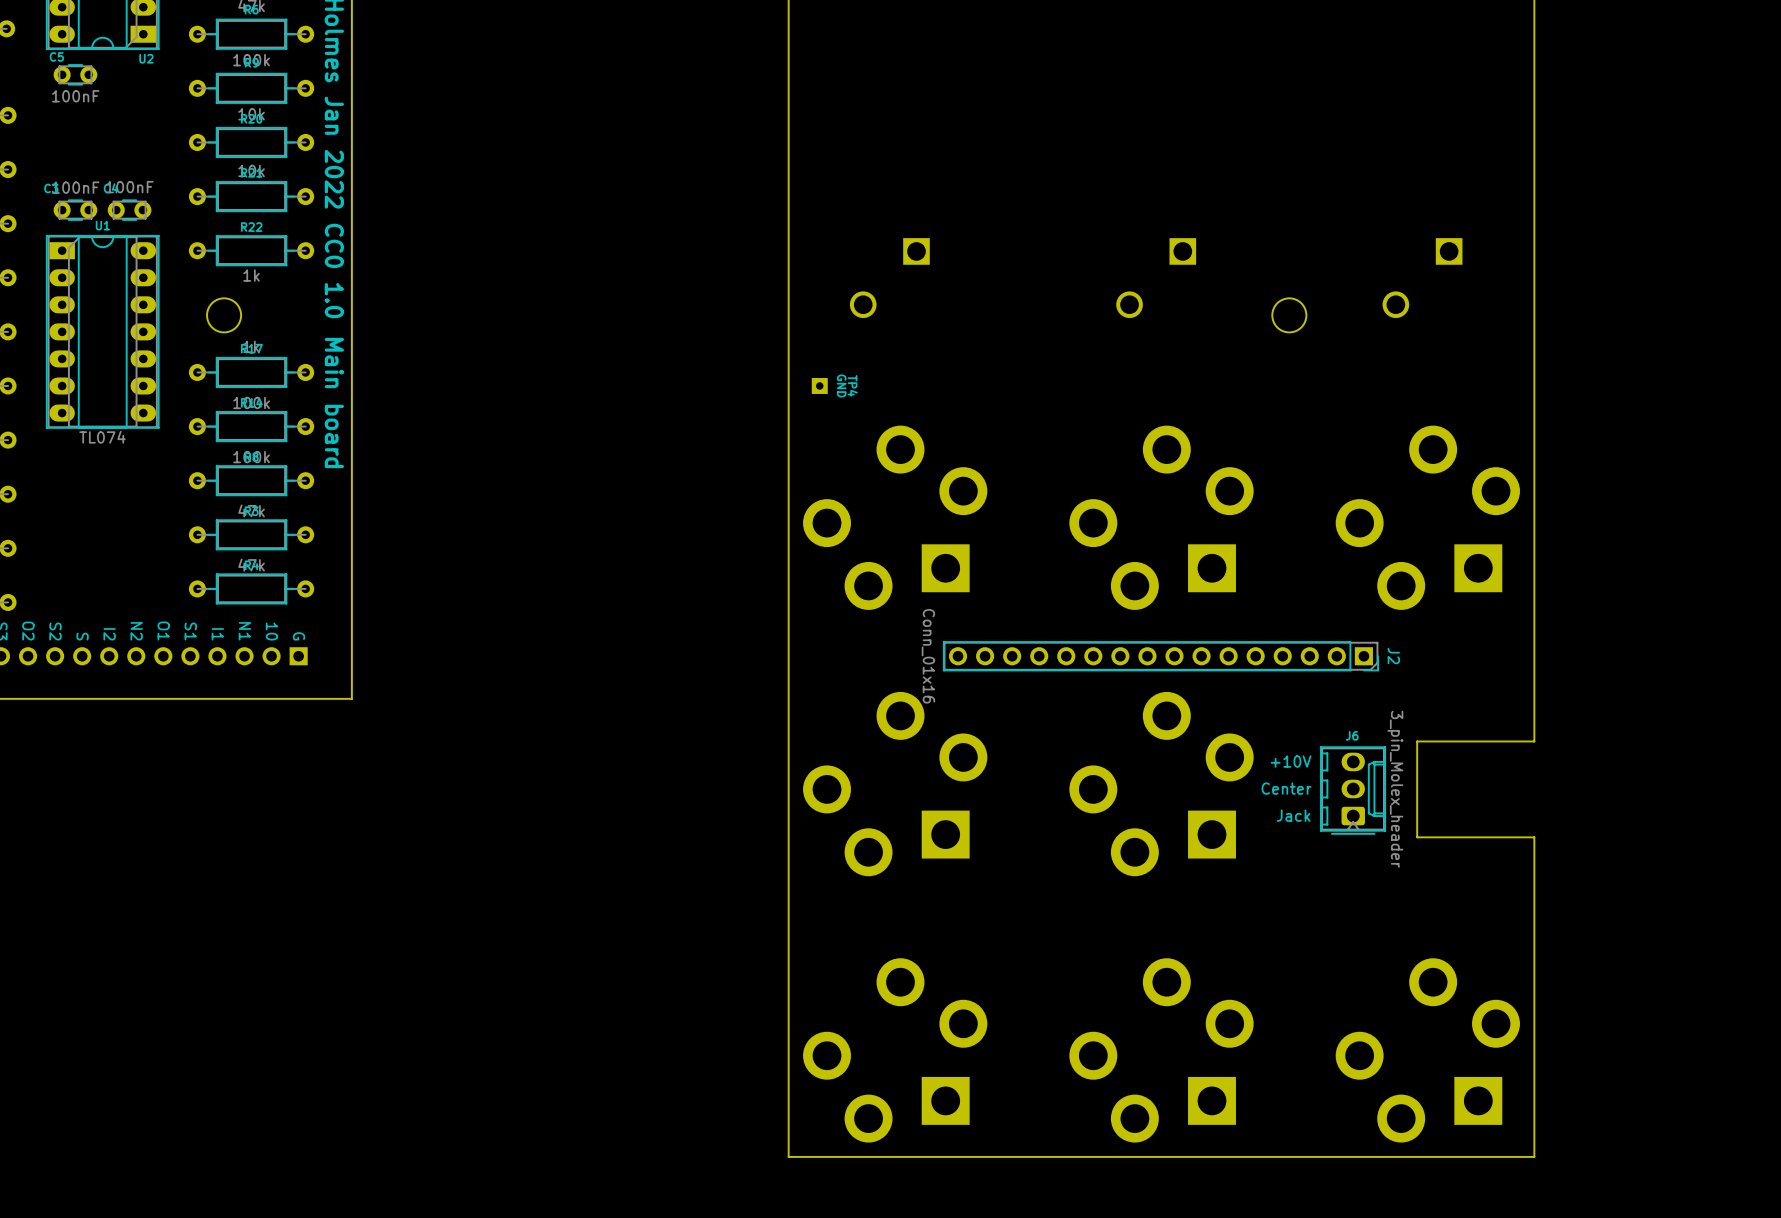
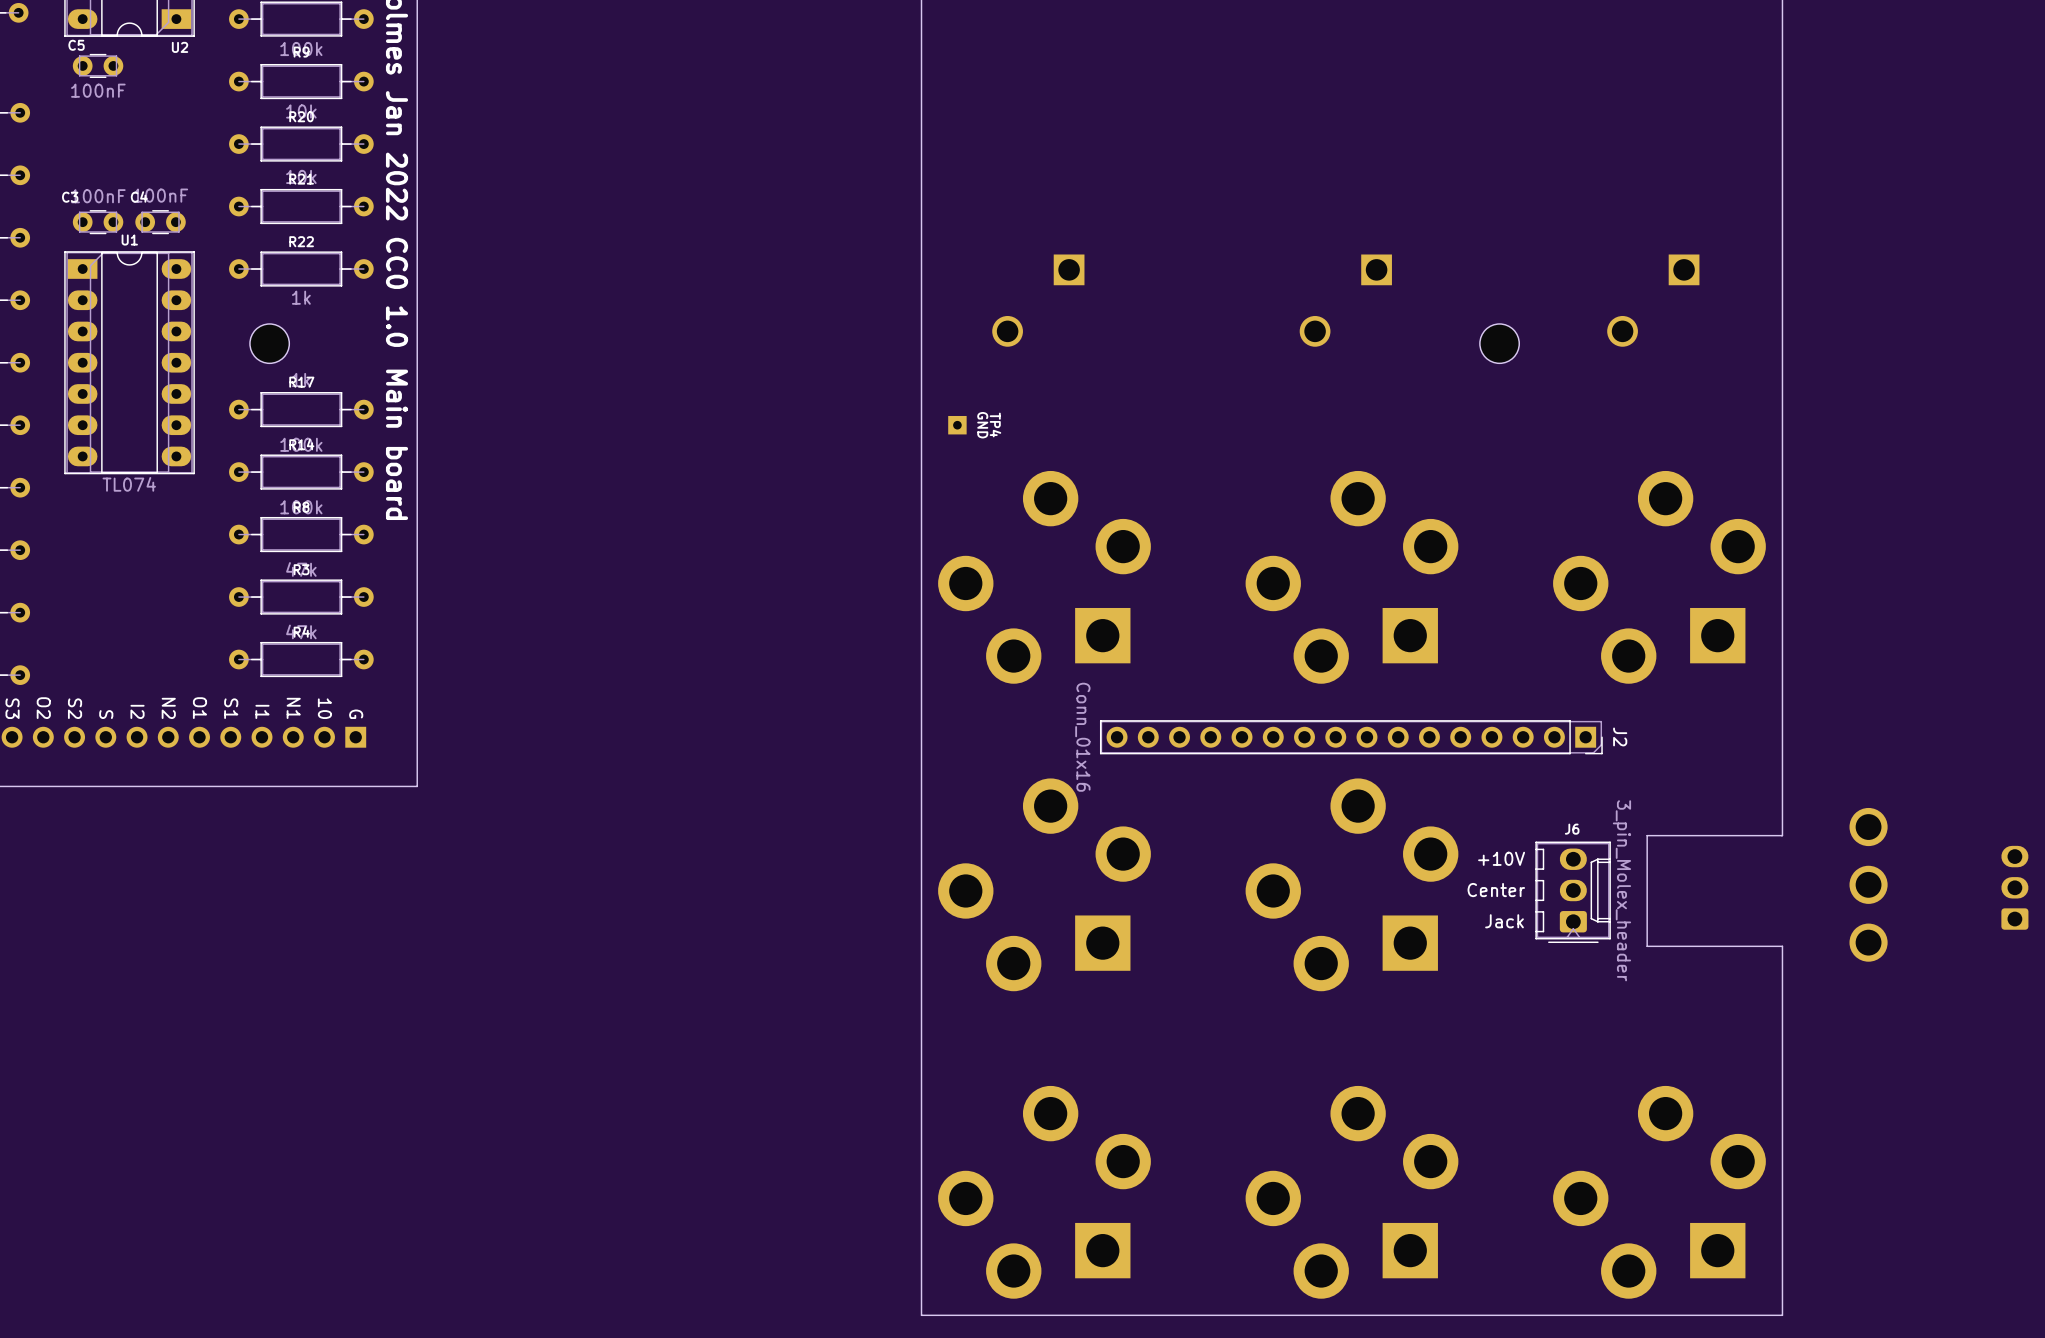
part: none -> (1868, 884)
part: none -> (2014, 887)

